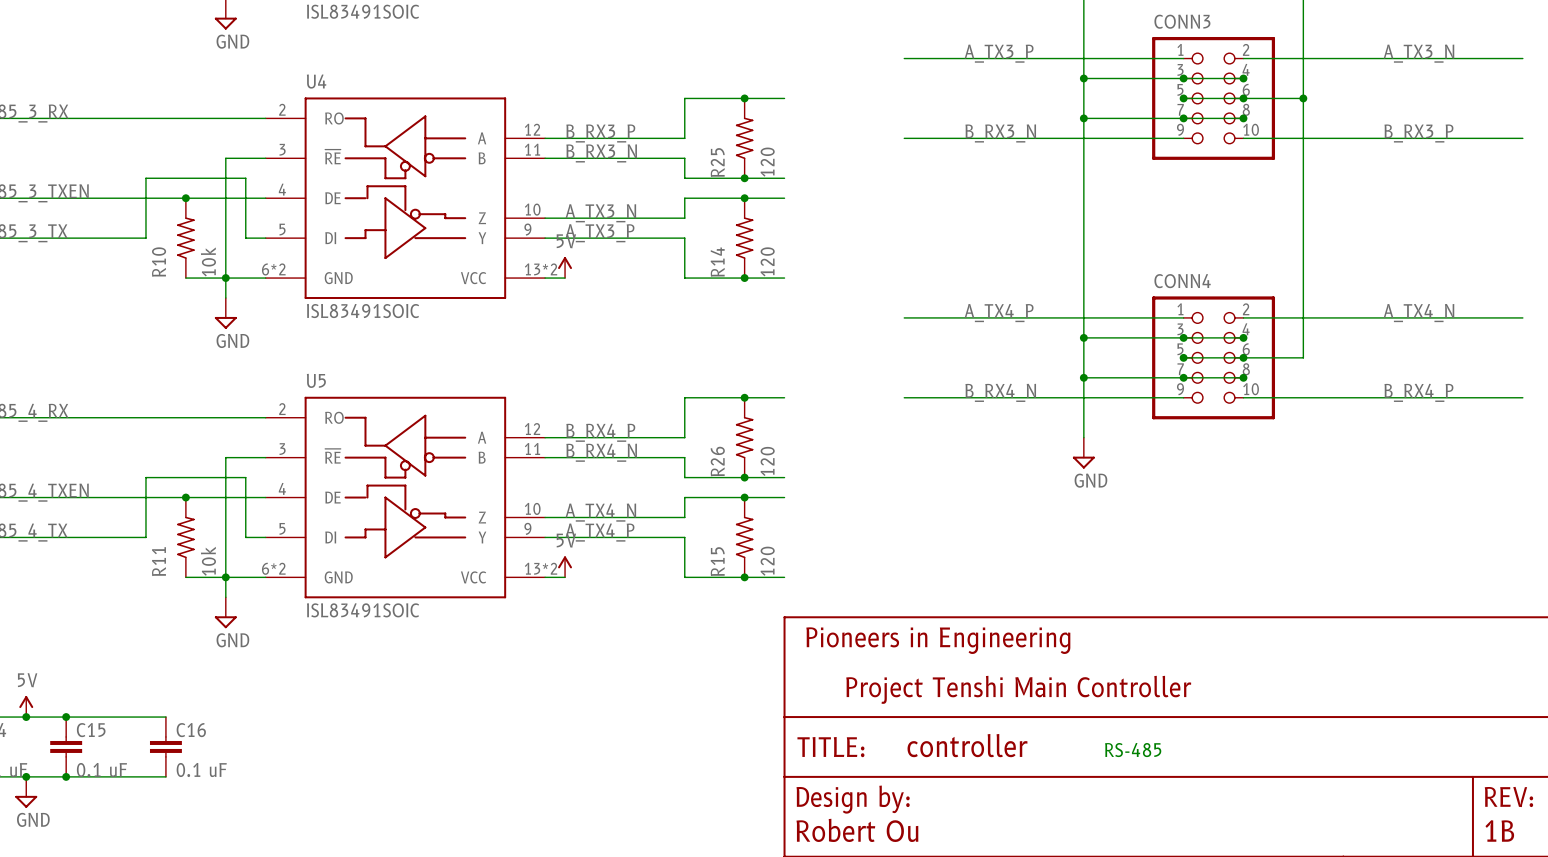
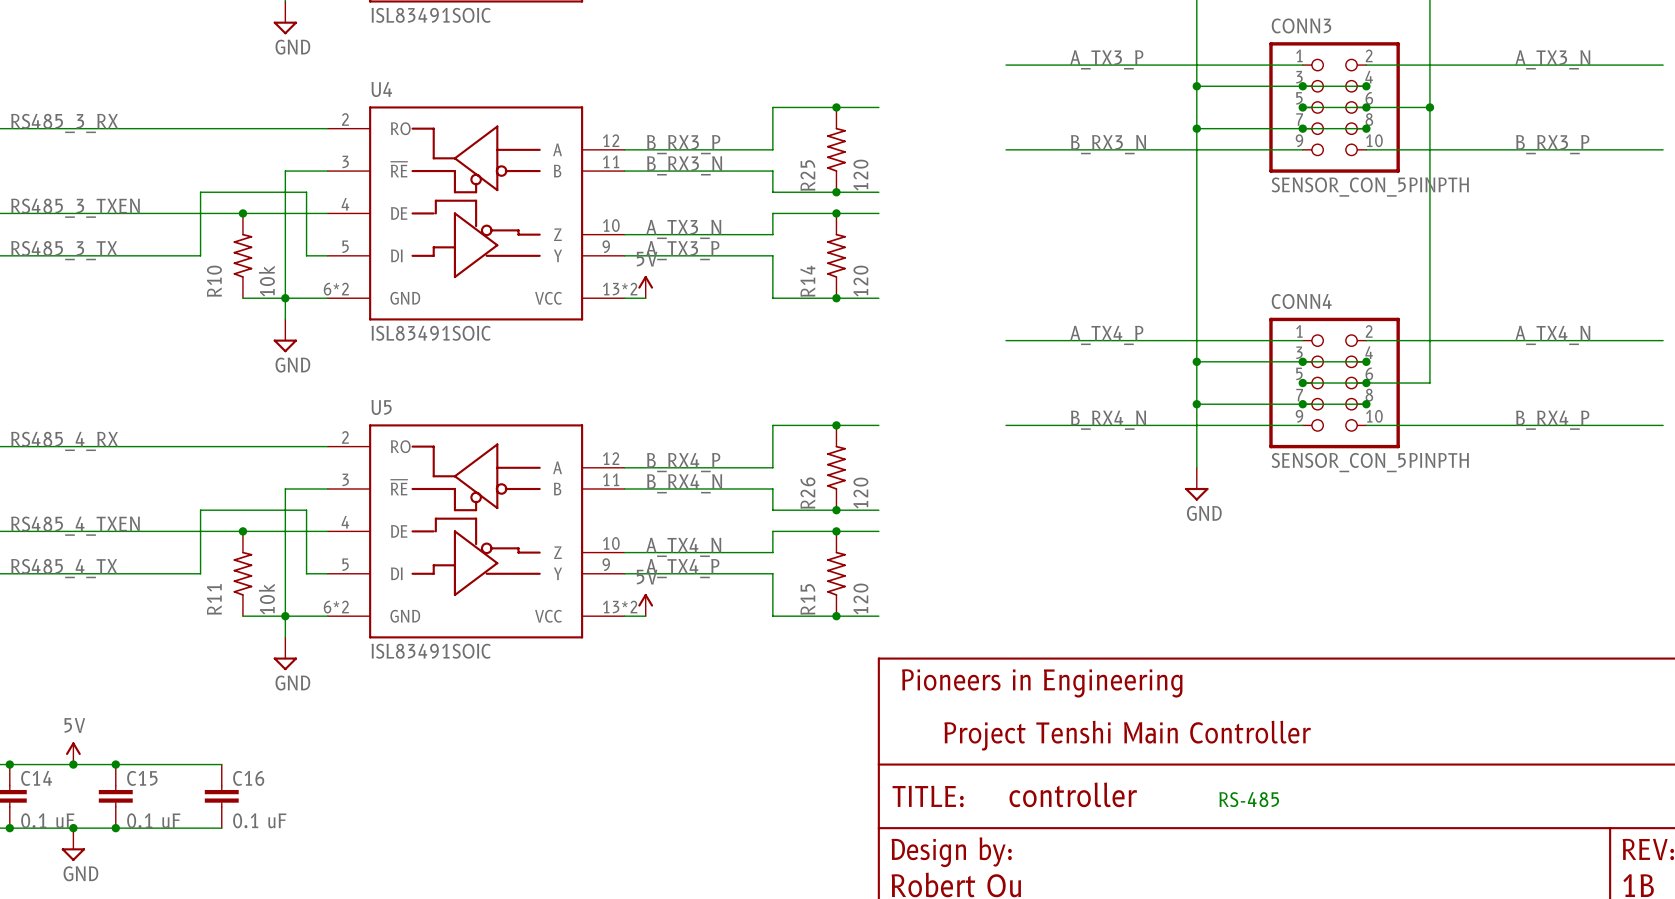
CONN3 value: none -> SENSOR_CON_5PINPTH (1370, 187)
CONN4 value: none -> SENSOR_CON_5PINPTH (1370, 462)

